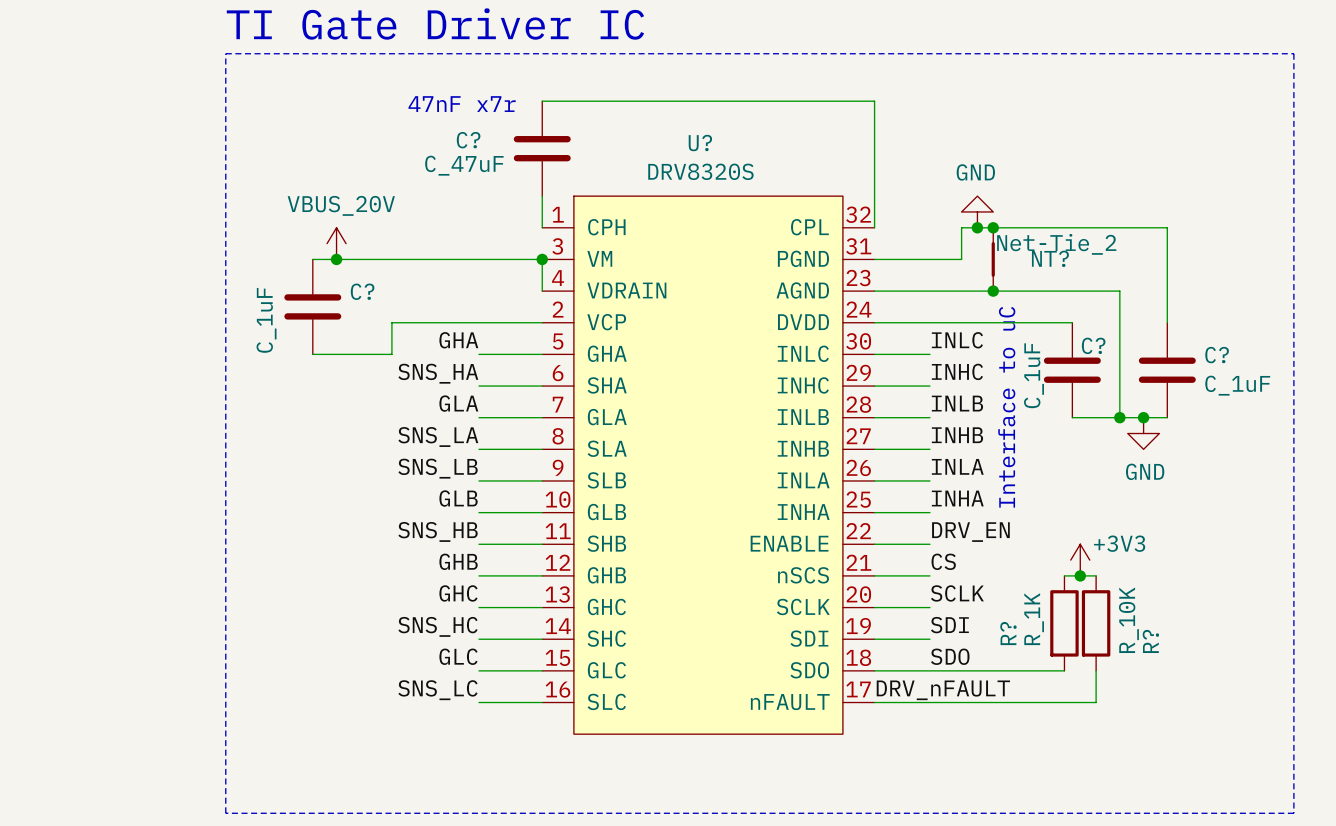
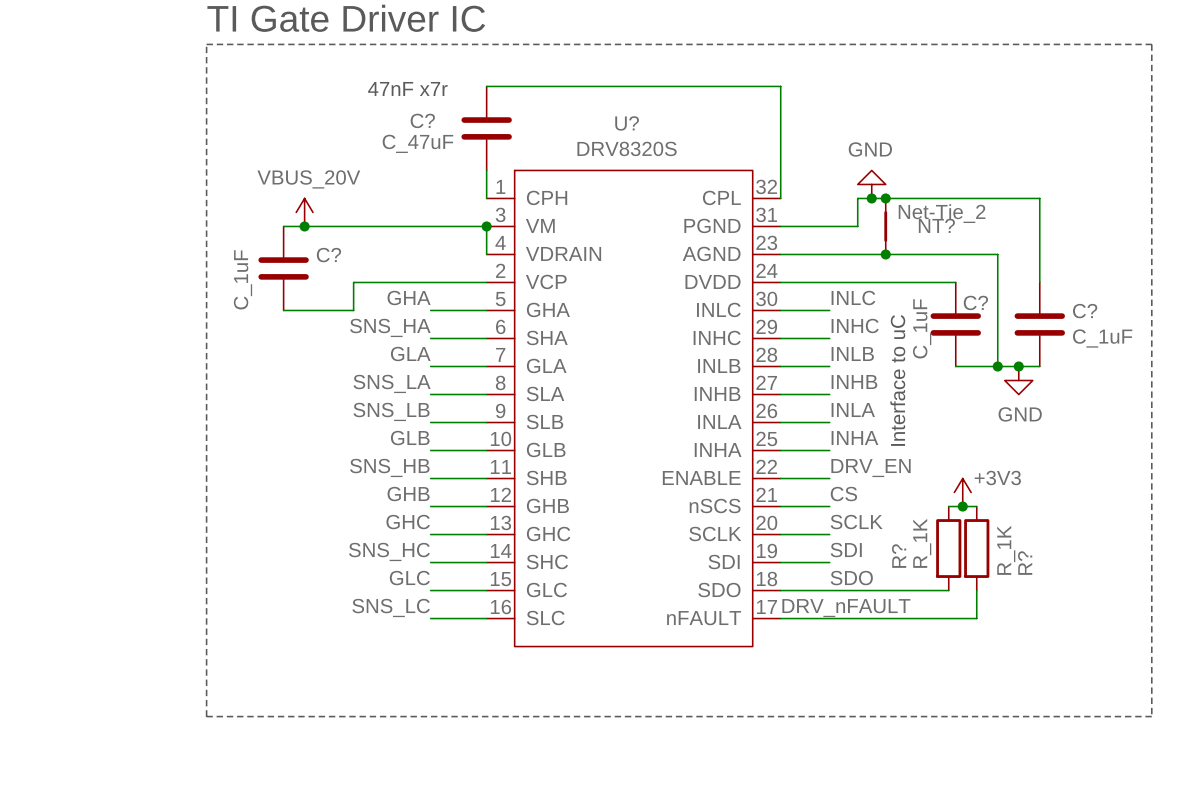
R? value: R_10K (1128, 620) -> R_1K (1006, 550)

